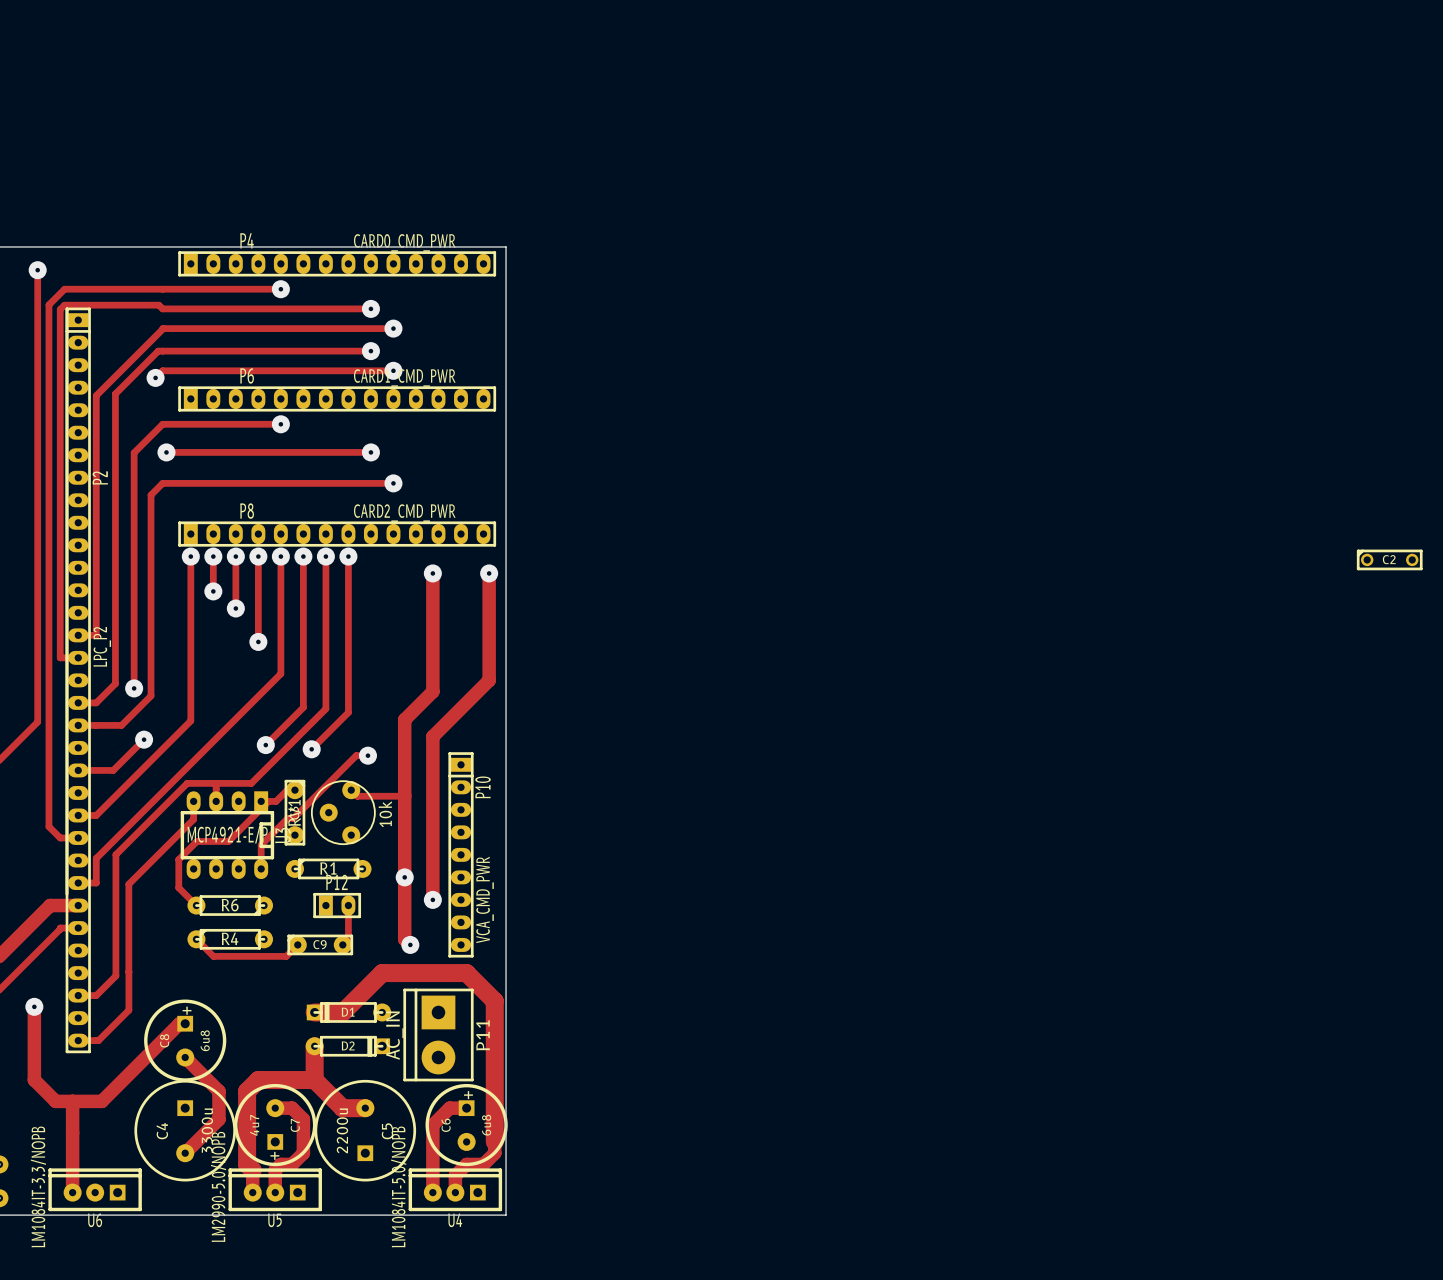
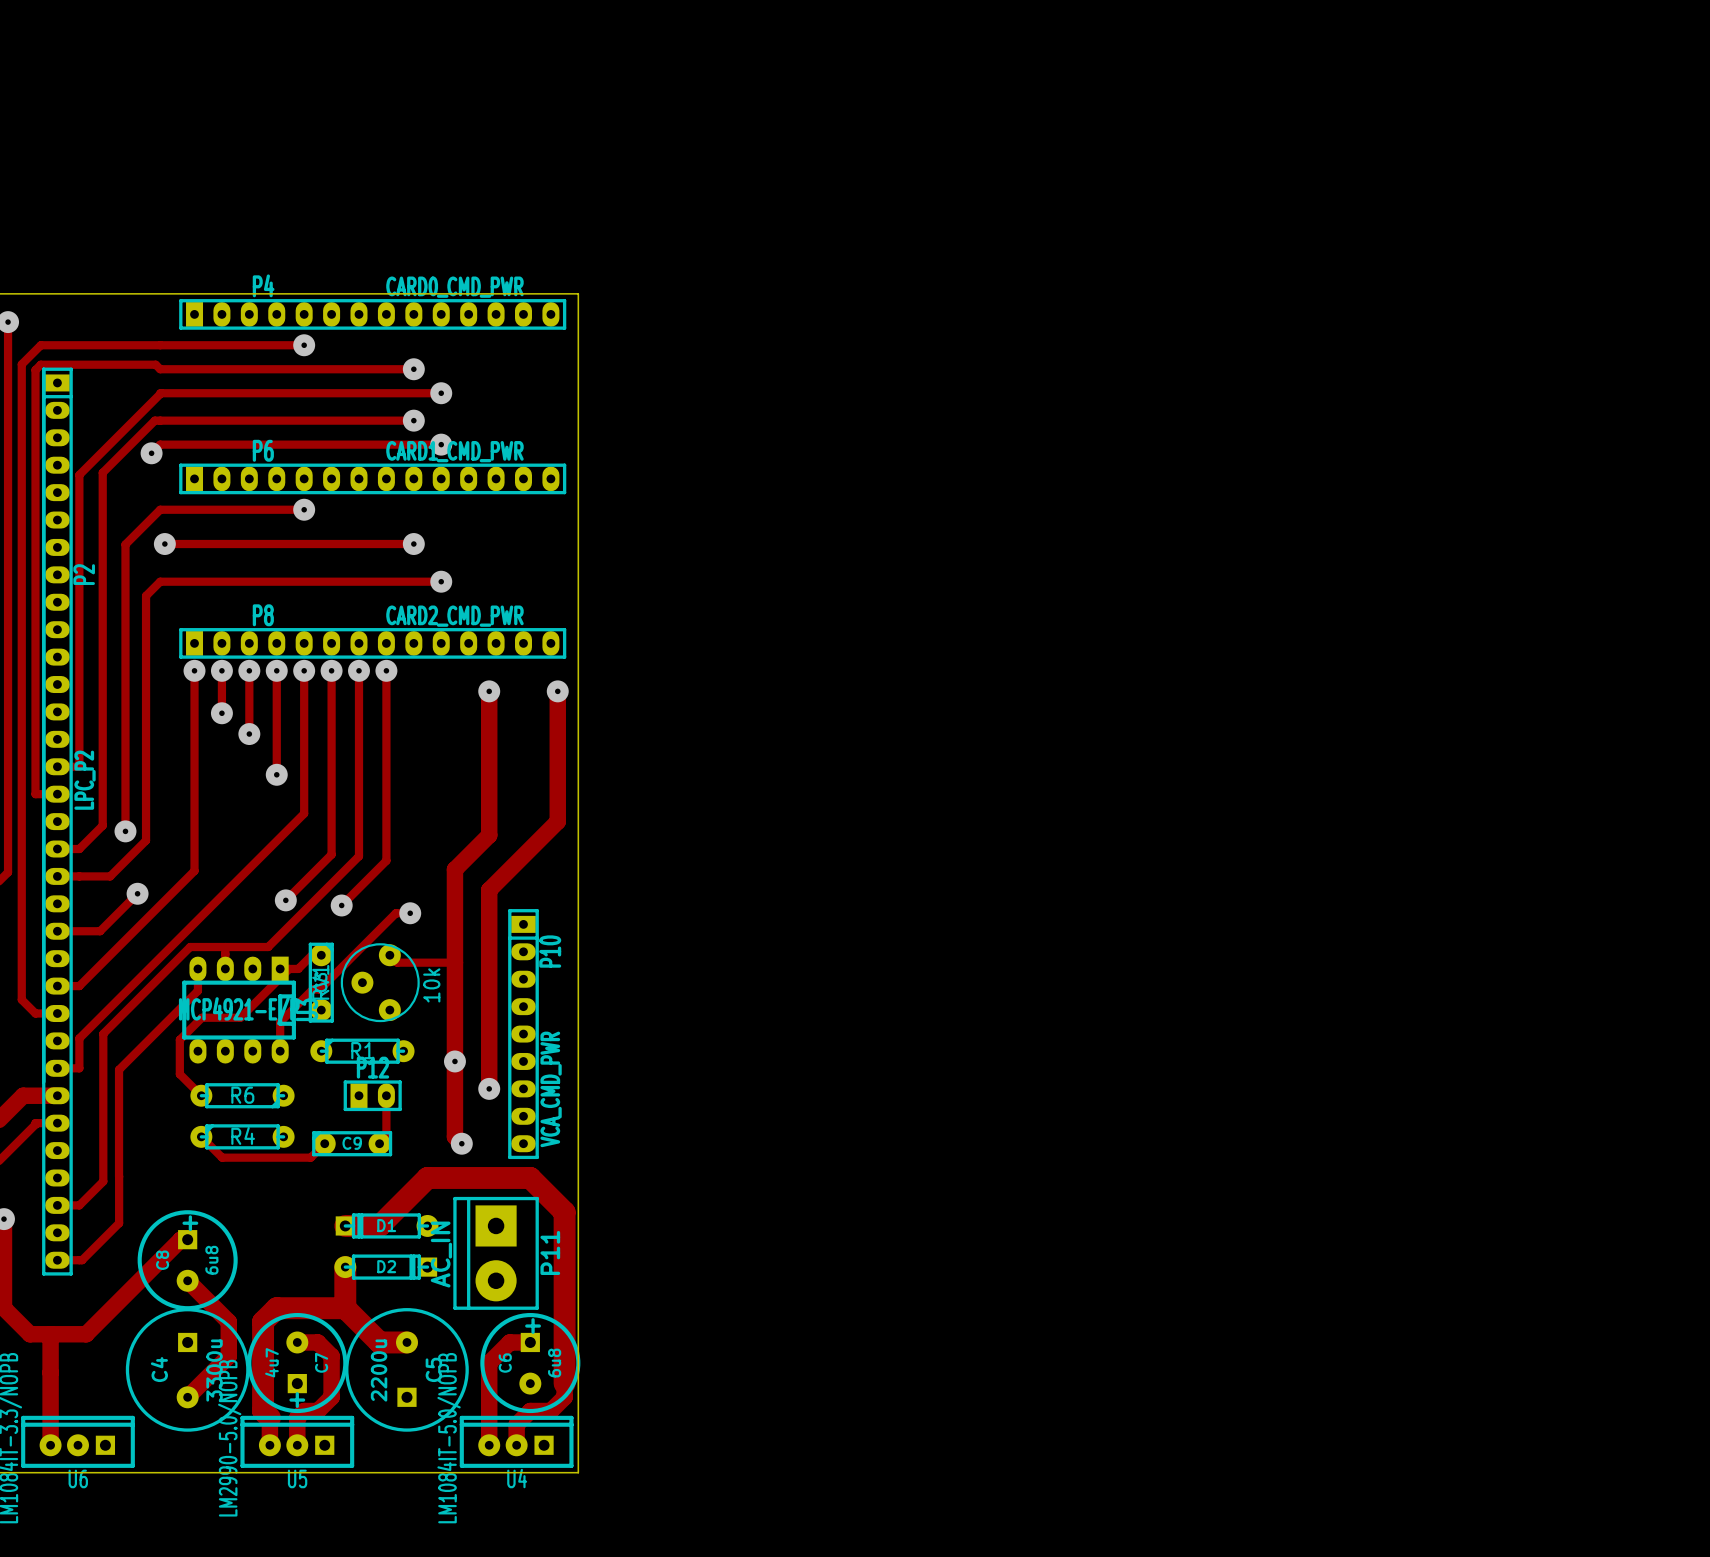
C2: (1389, 559) -> none

